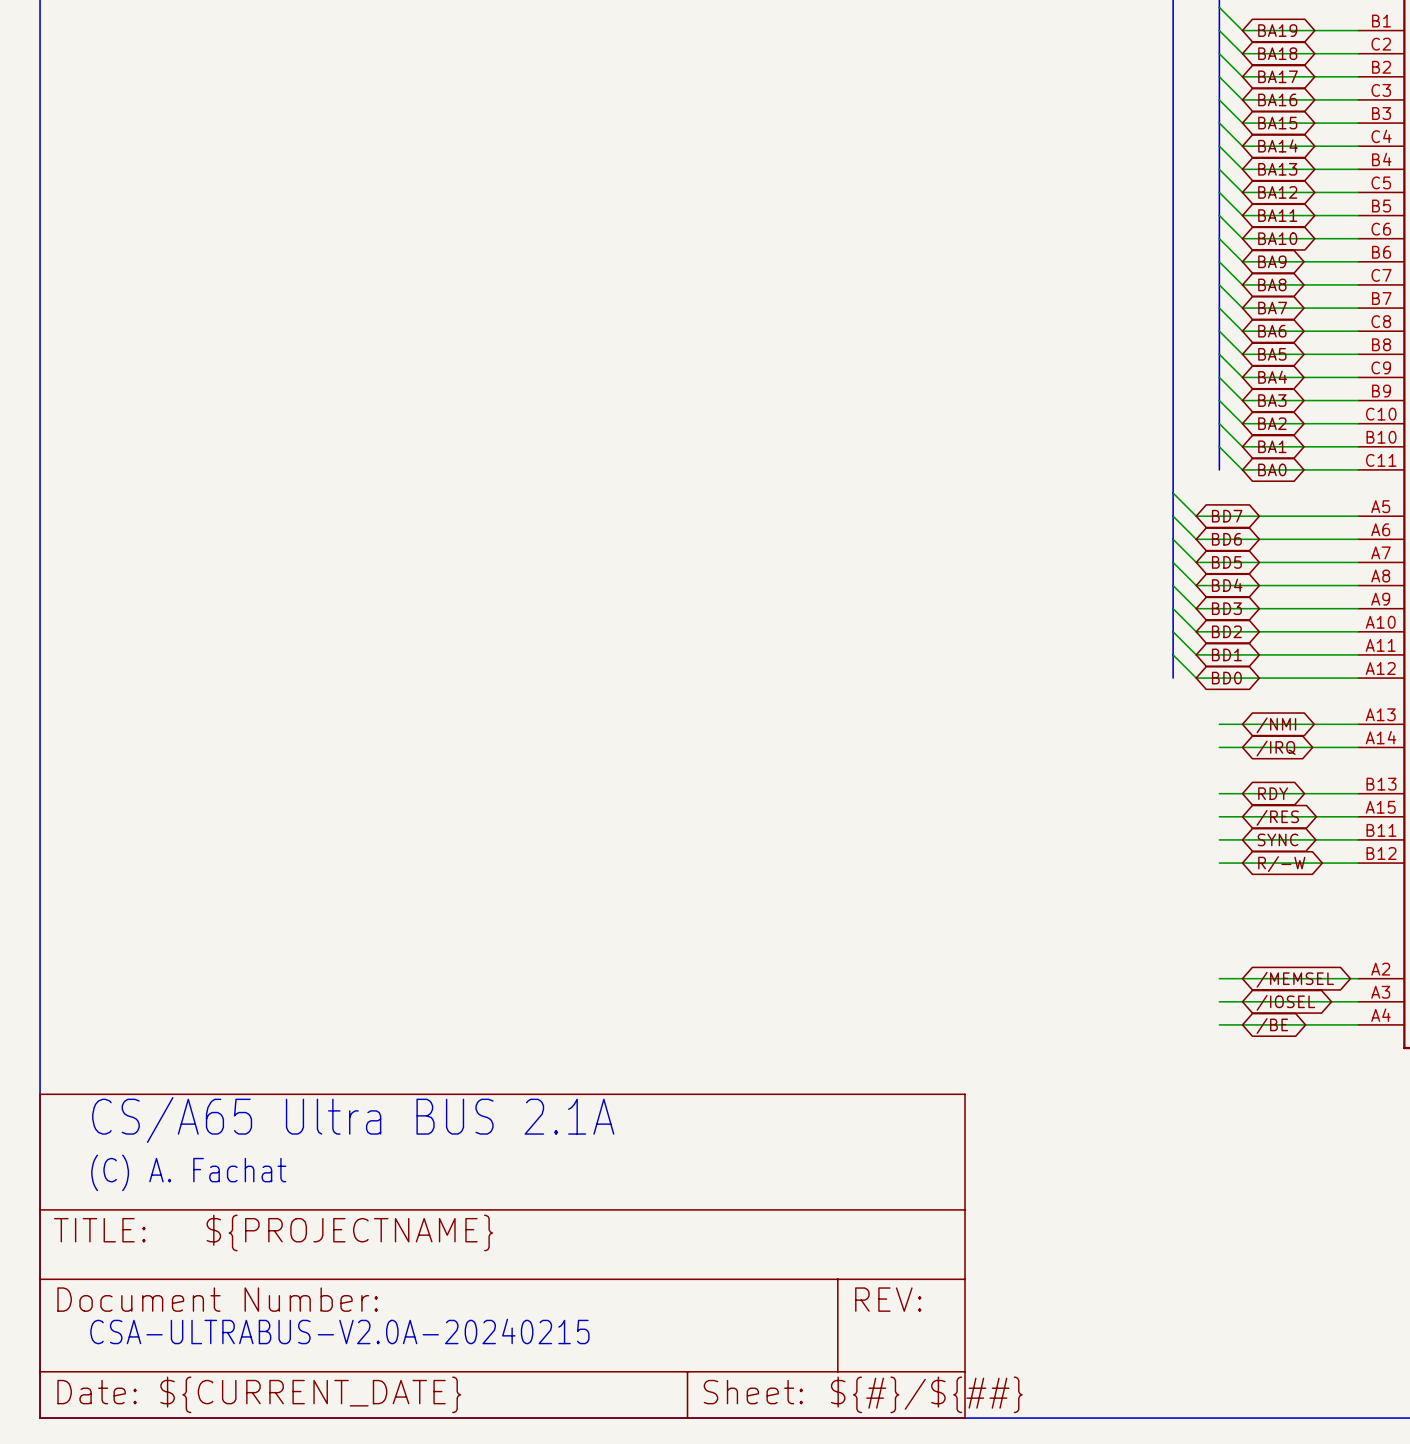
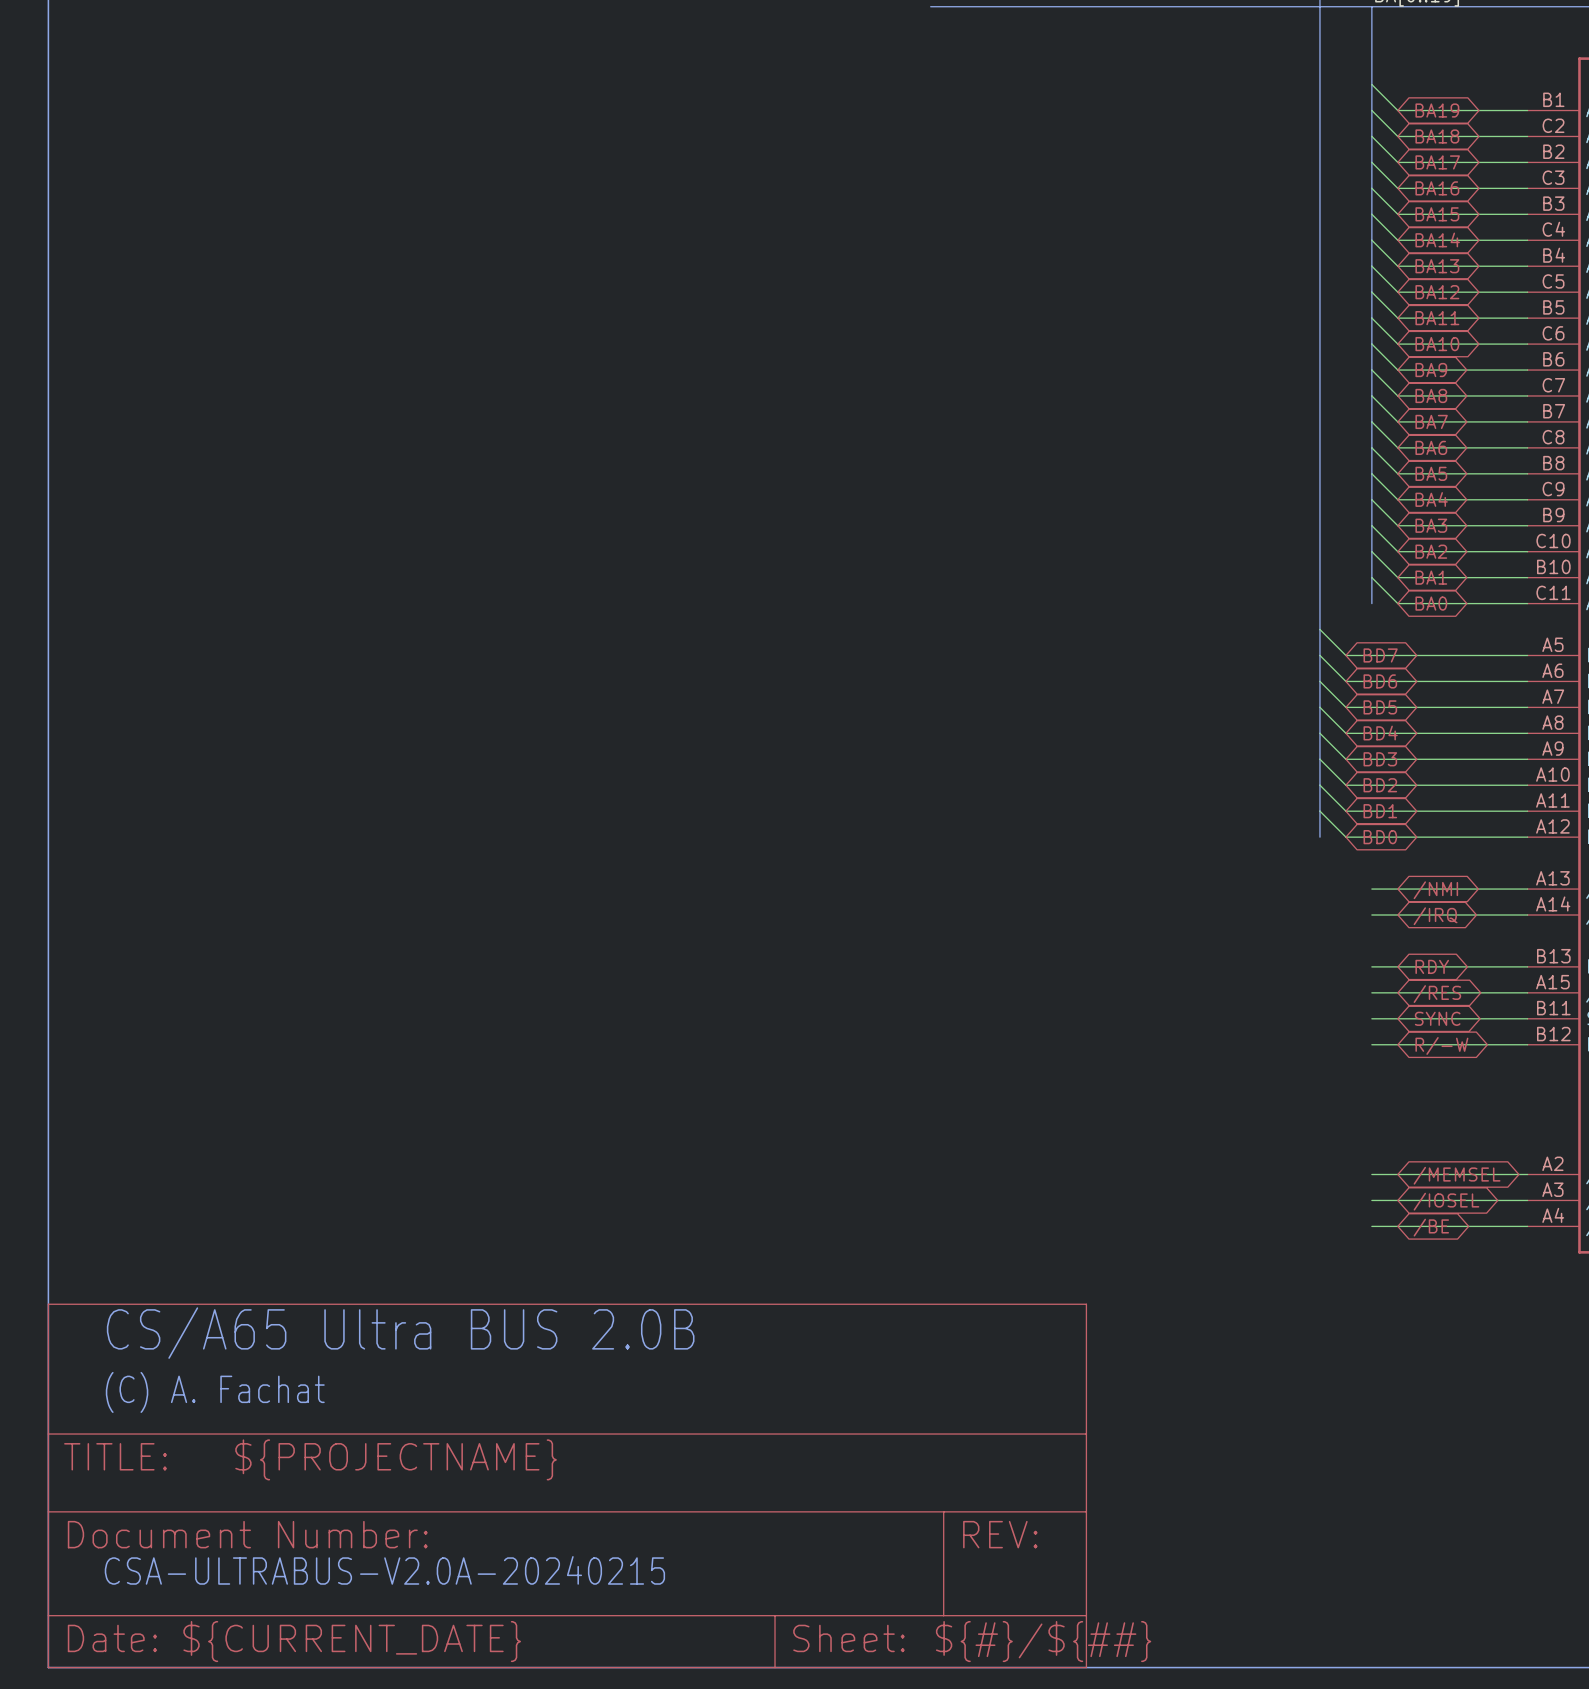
text: CS/A65 Ultra BUS 2.1A (353, 1119) -> CS/A65 Ultra BUS 2.0B (400, 1333)

